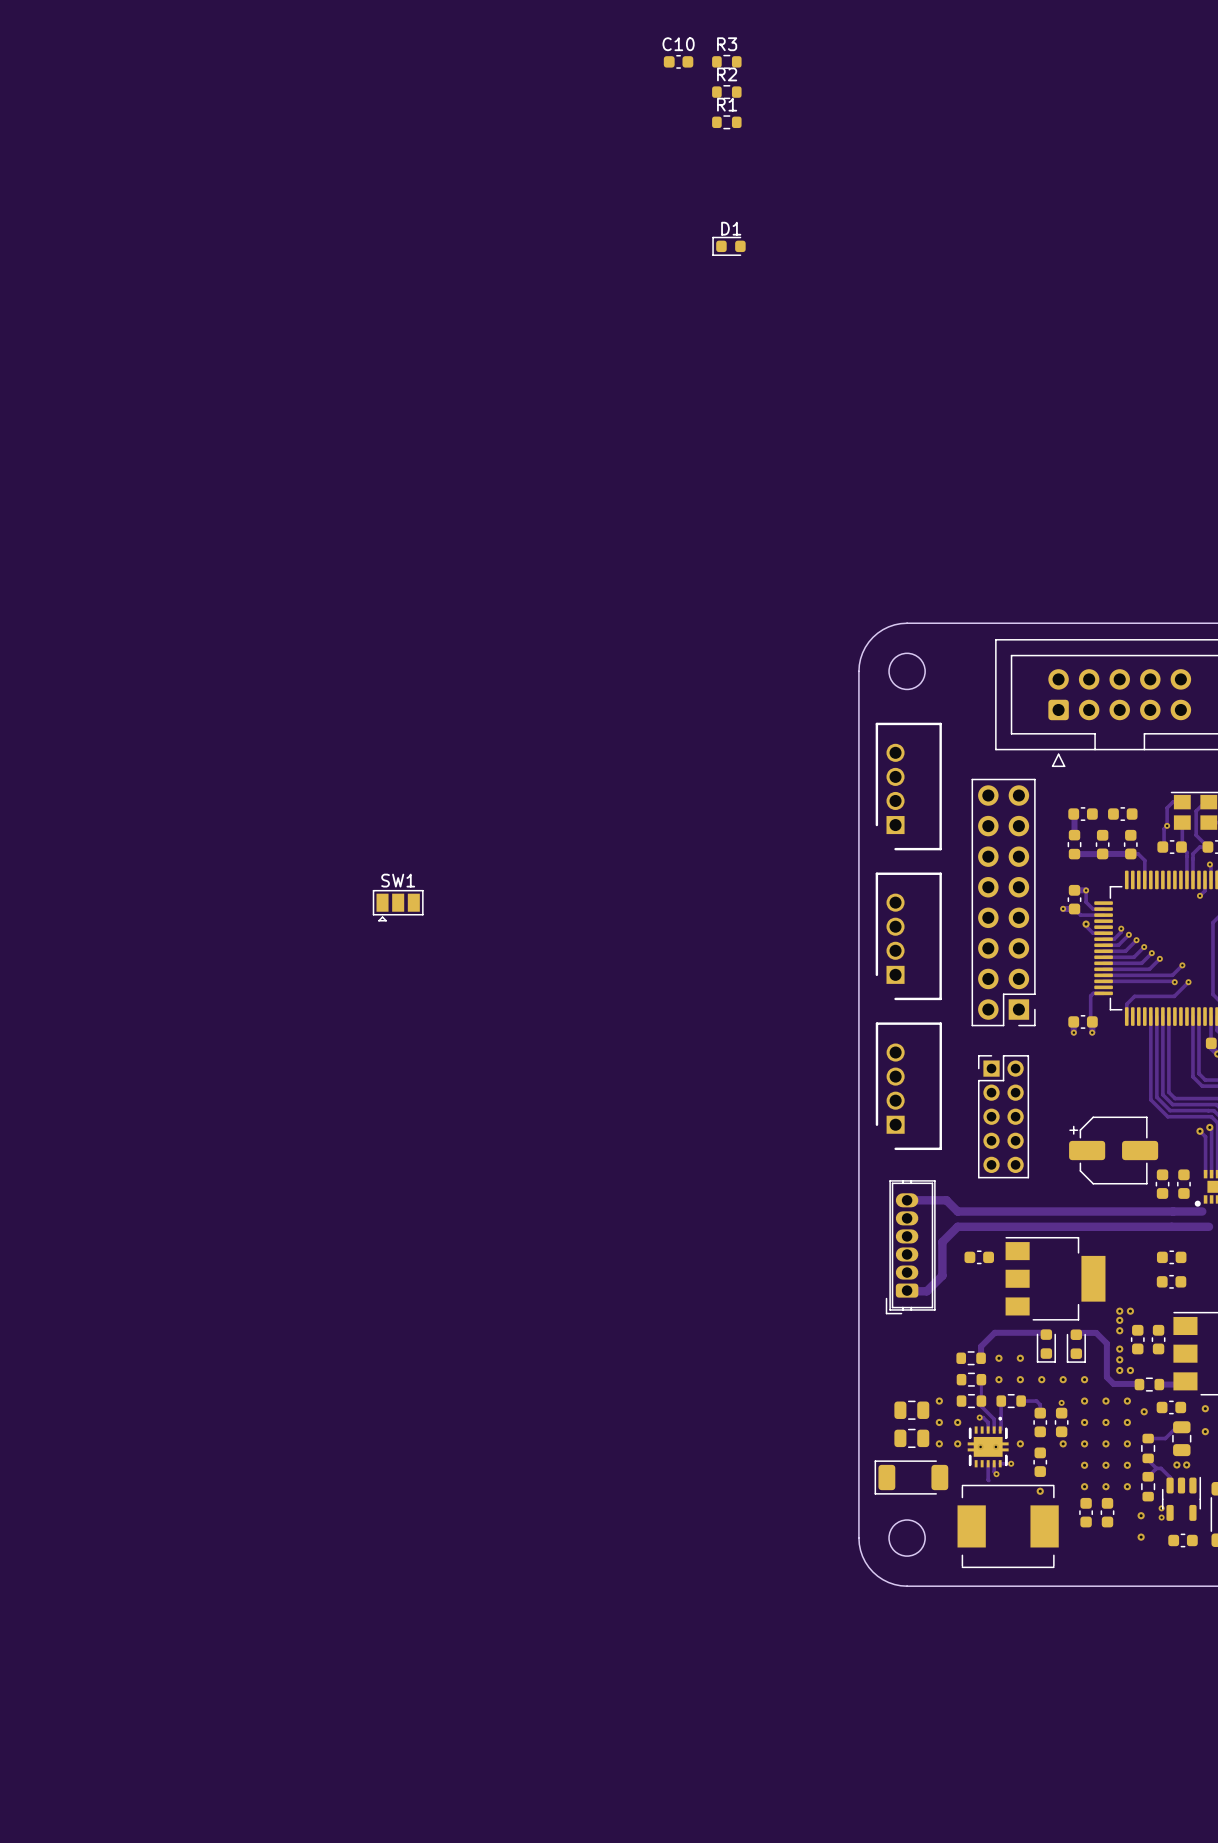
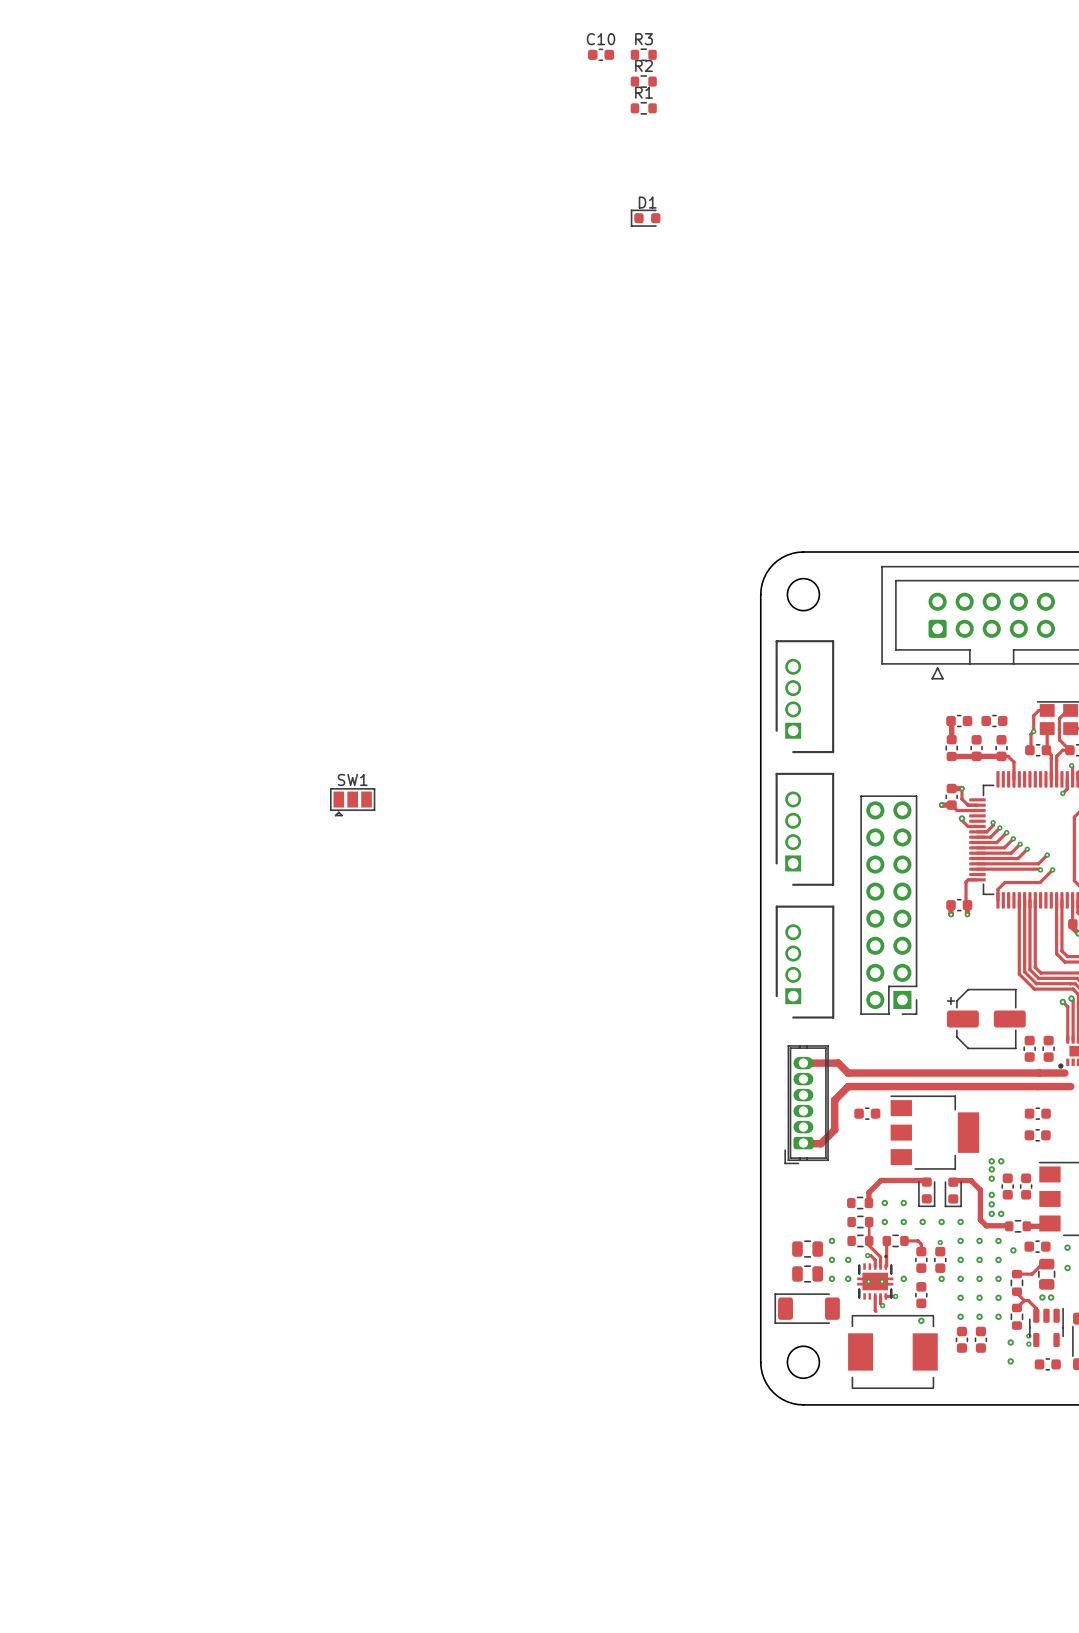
part position: (1003, 902) -> (888, 905)
part: (1003, 1116) -> none

